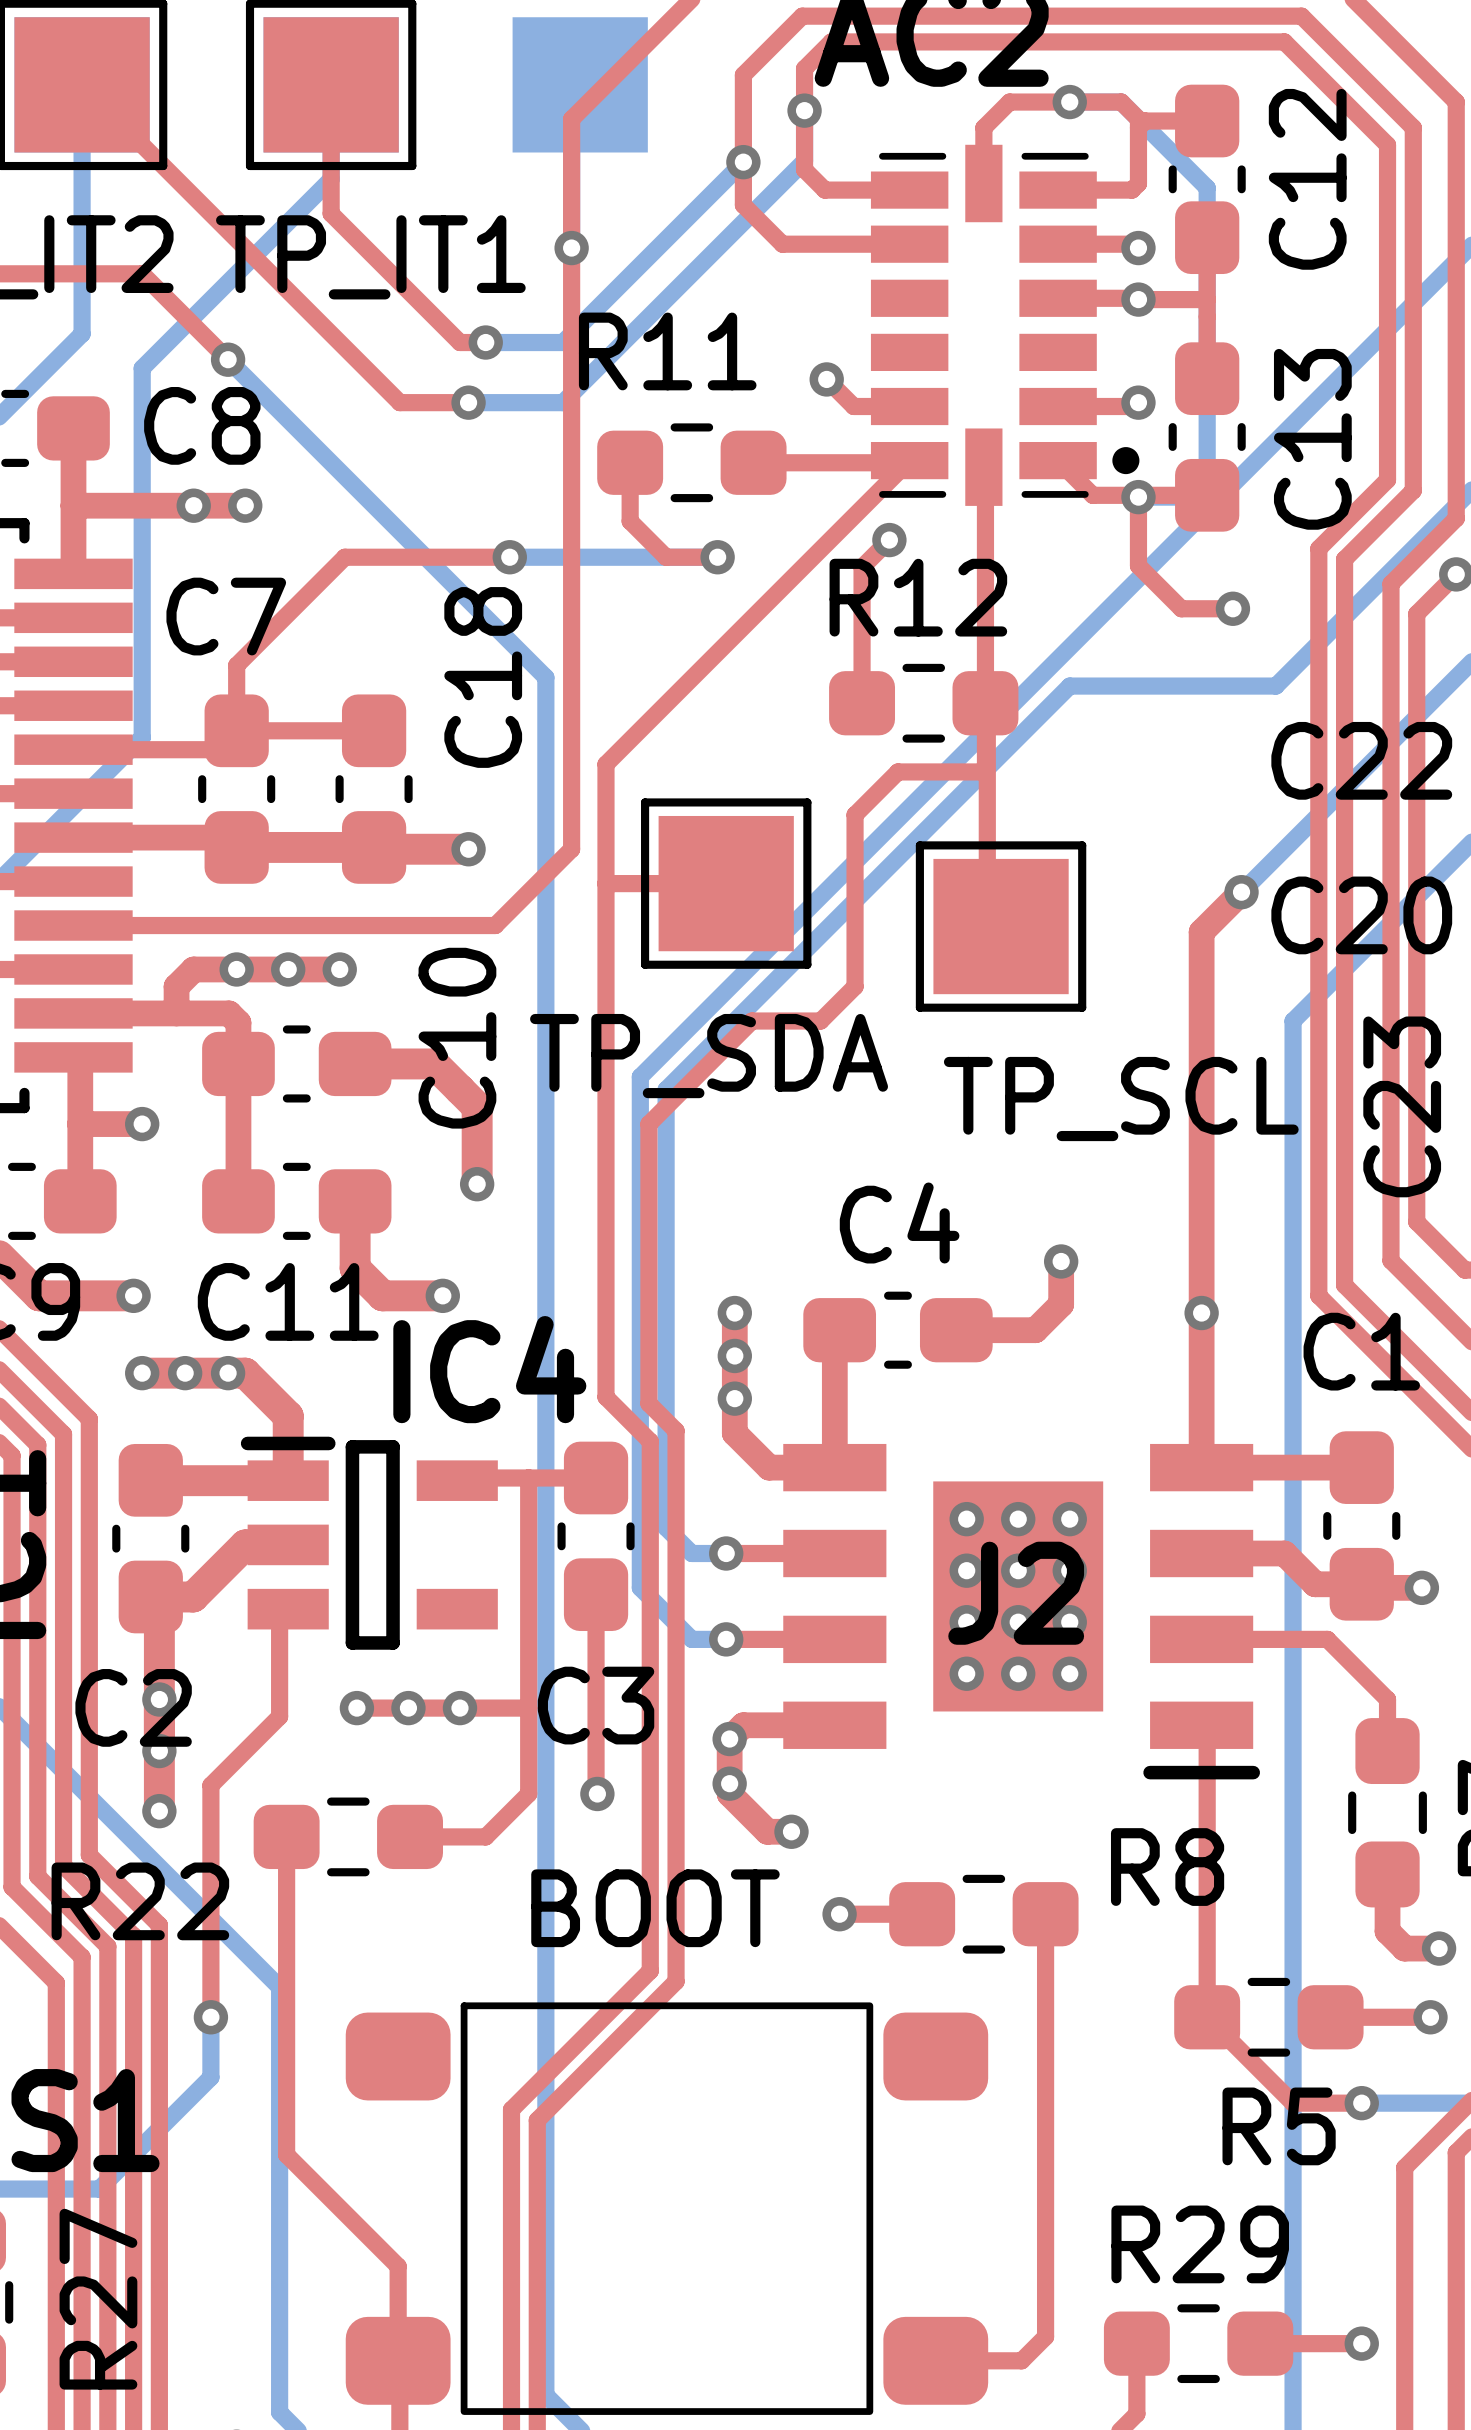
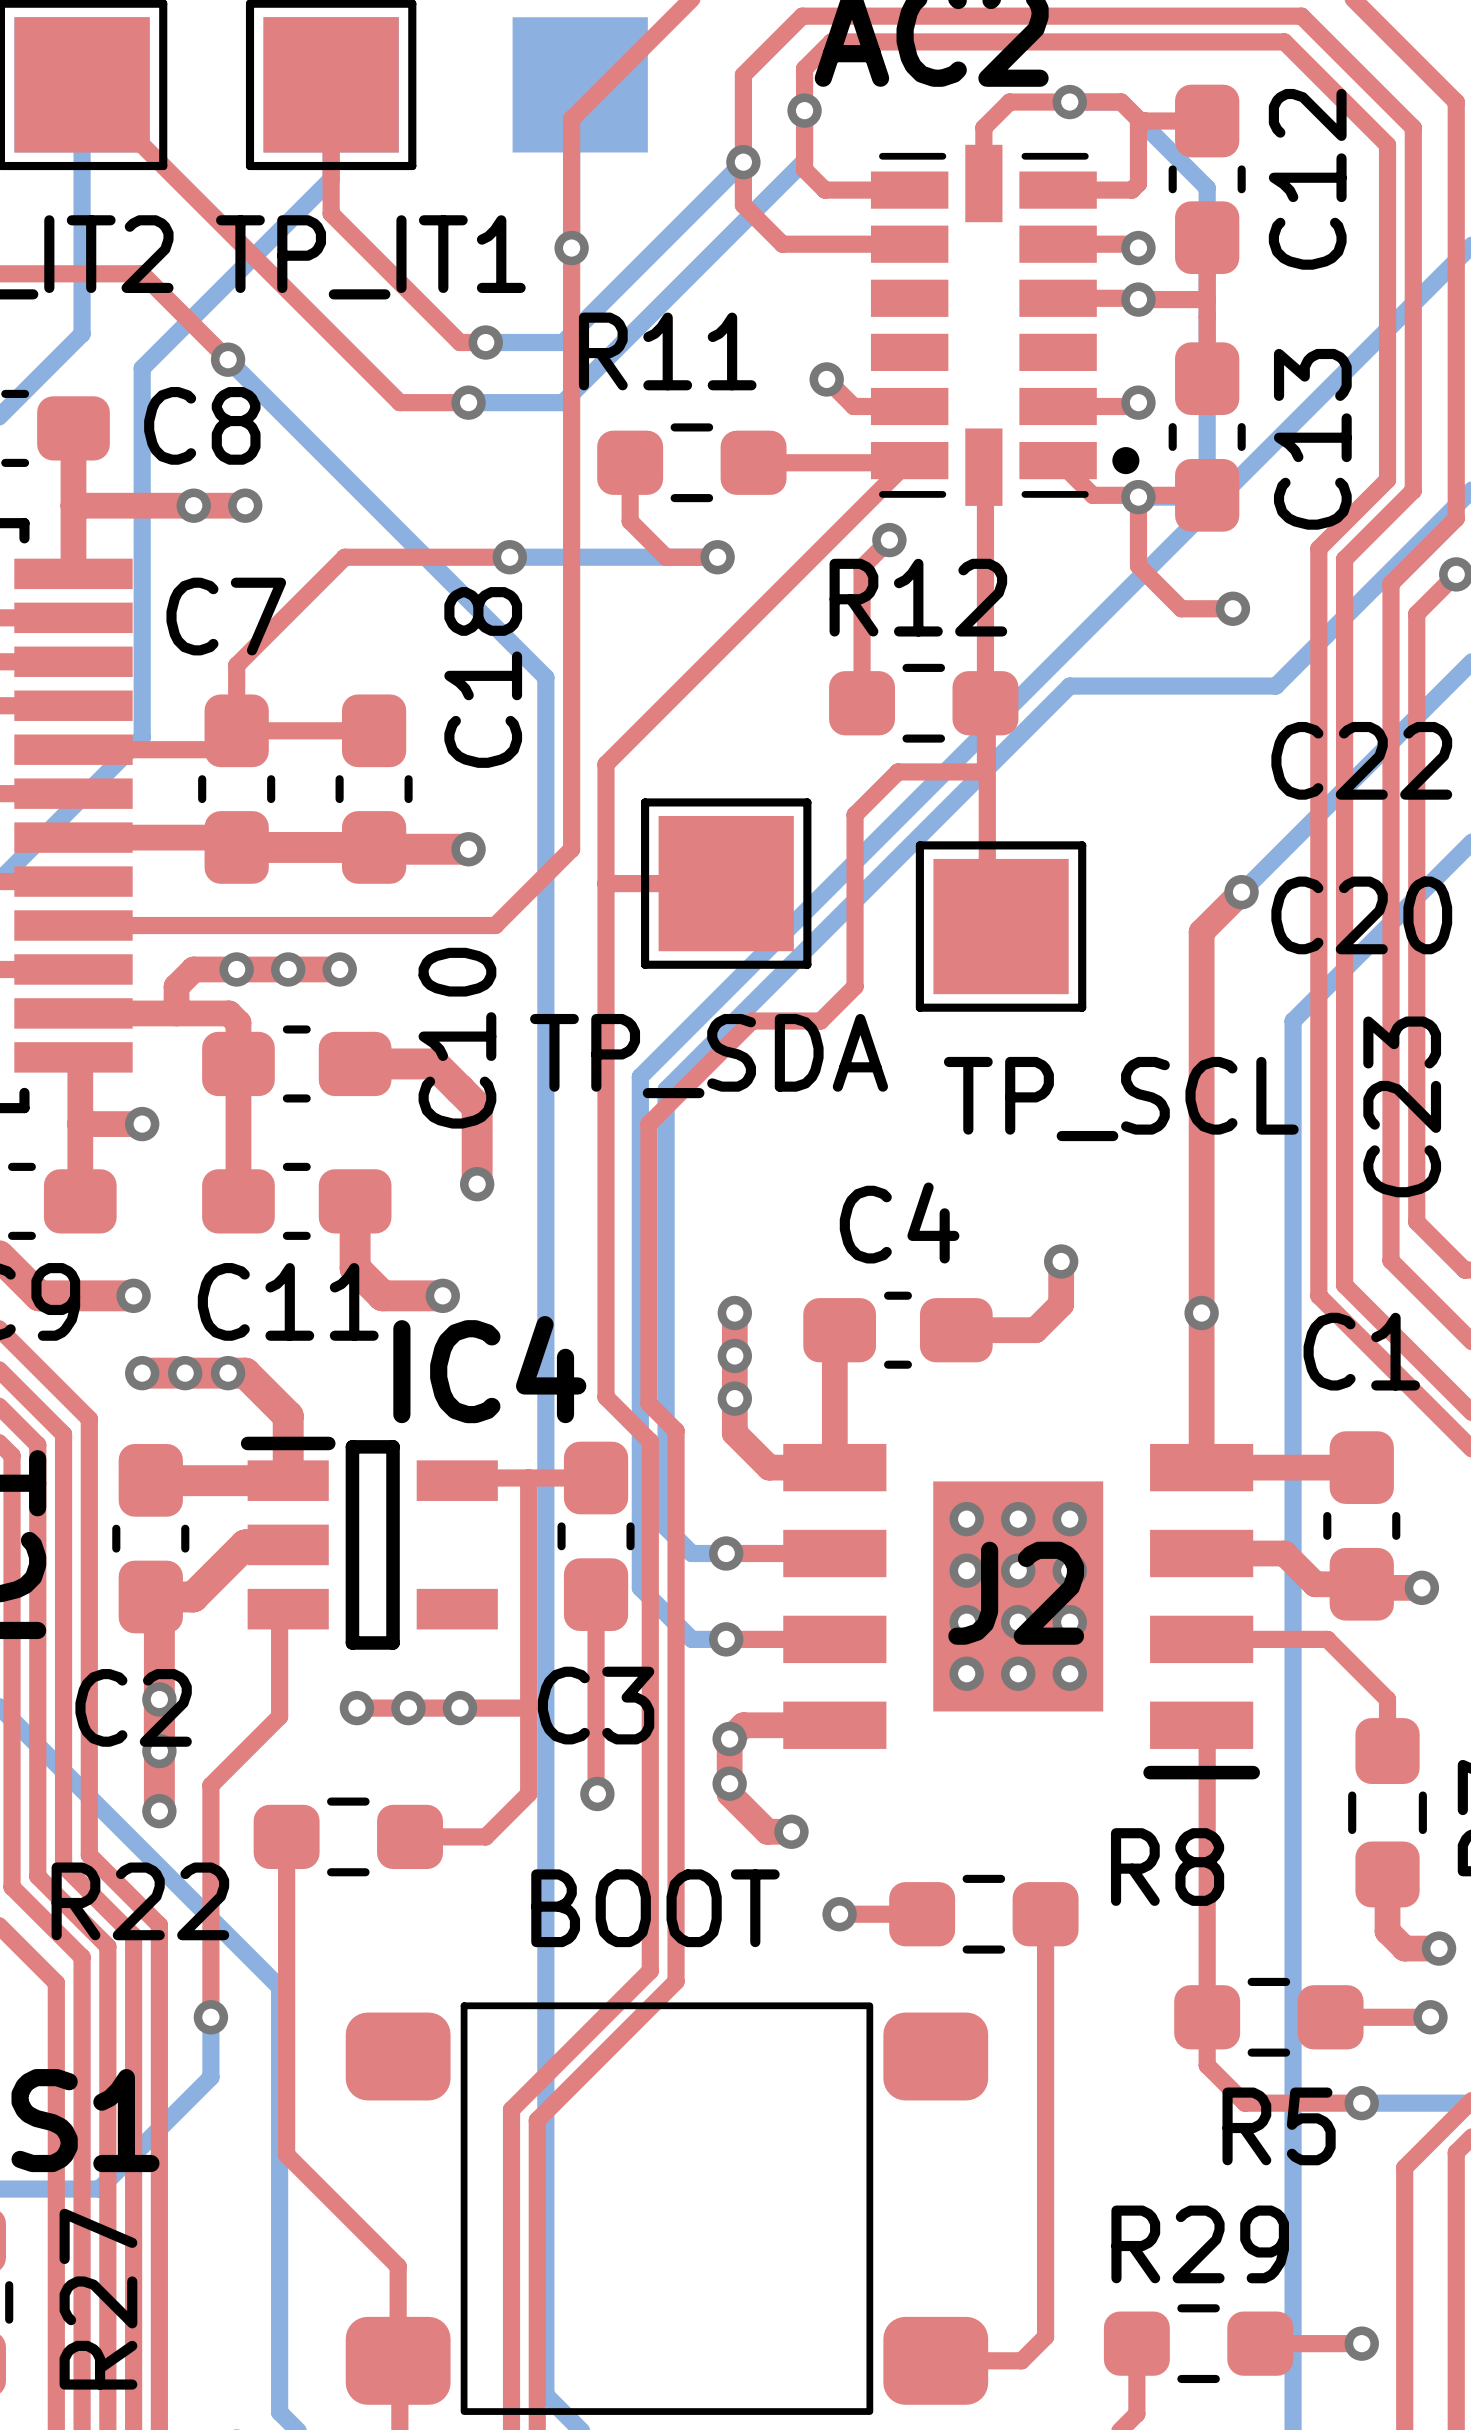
top track: (1207, 2017) (1293, 2103) -> (1207, 2017) (1207, 2065) (1244, 2103) (1293, 2103)

